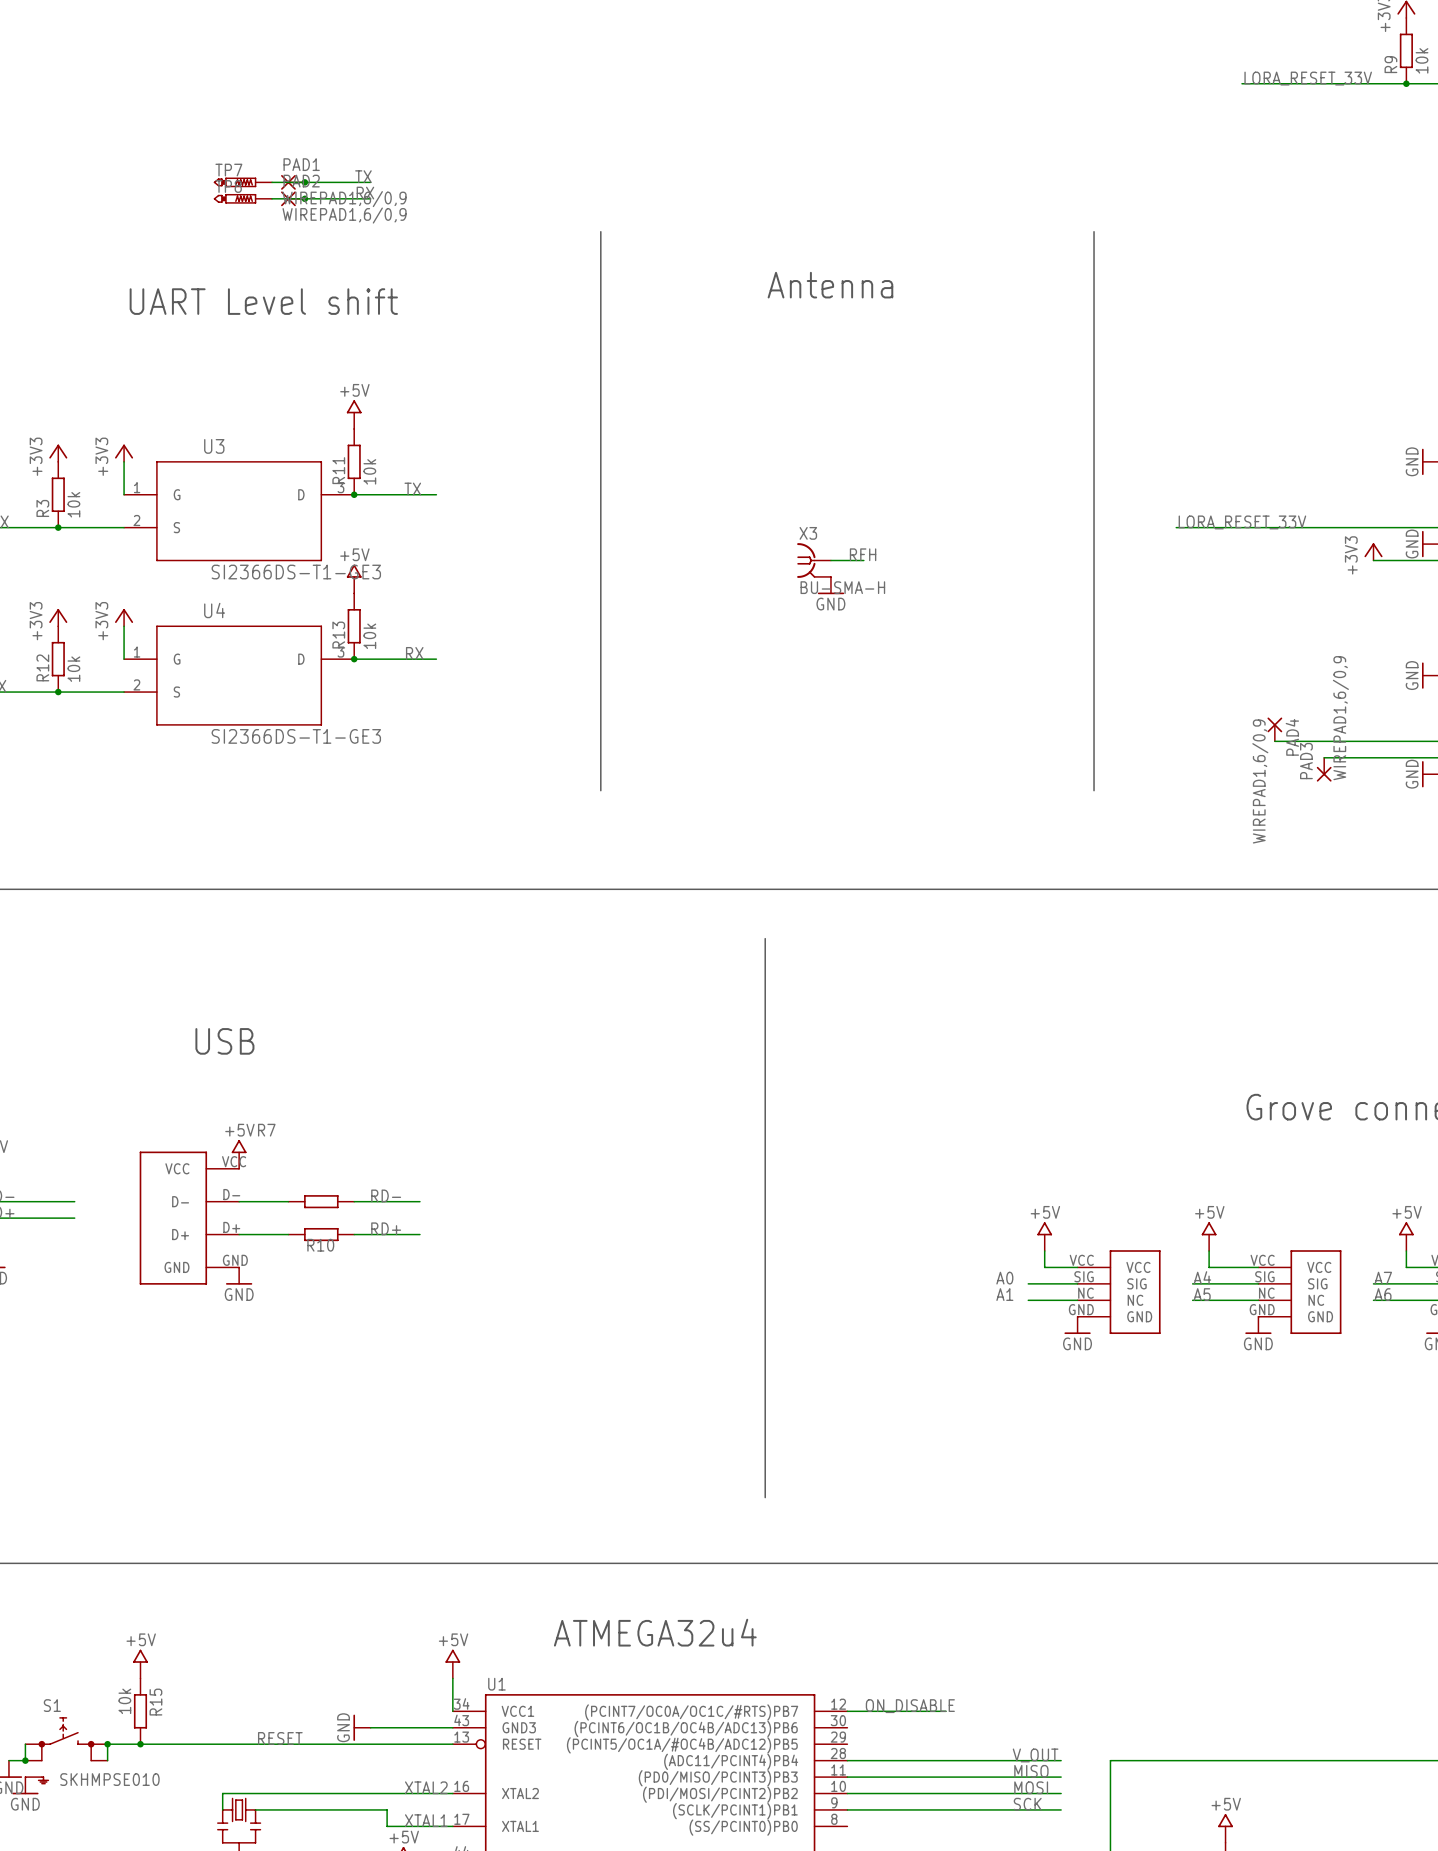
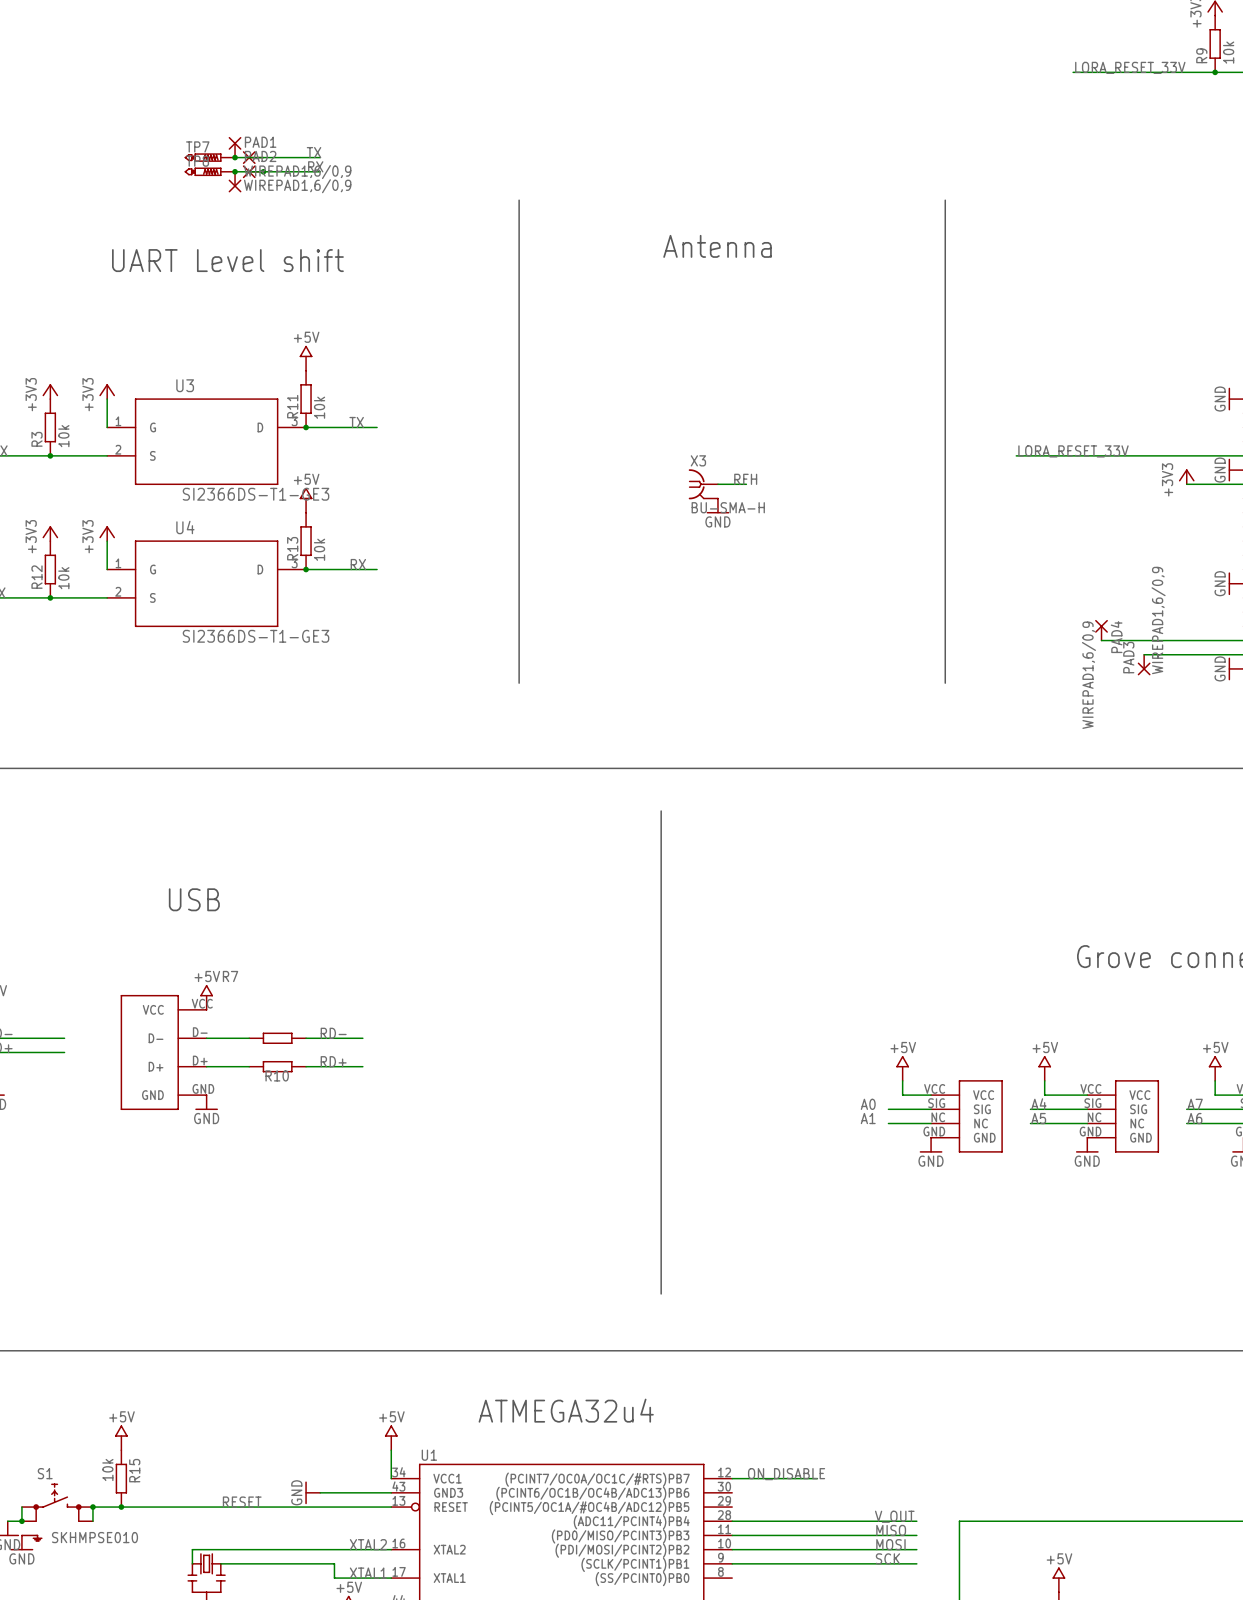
part: none -> (235, 147)
junction: none -> (235, 157)
junction: (304, 182) -> none
junction: none -> (235, 171)
part: none -> (235, 182)

